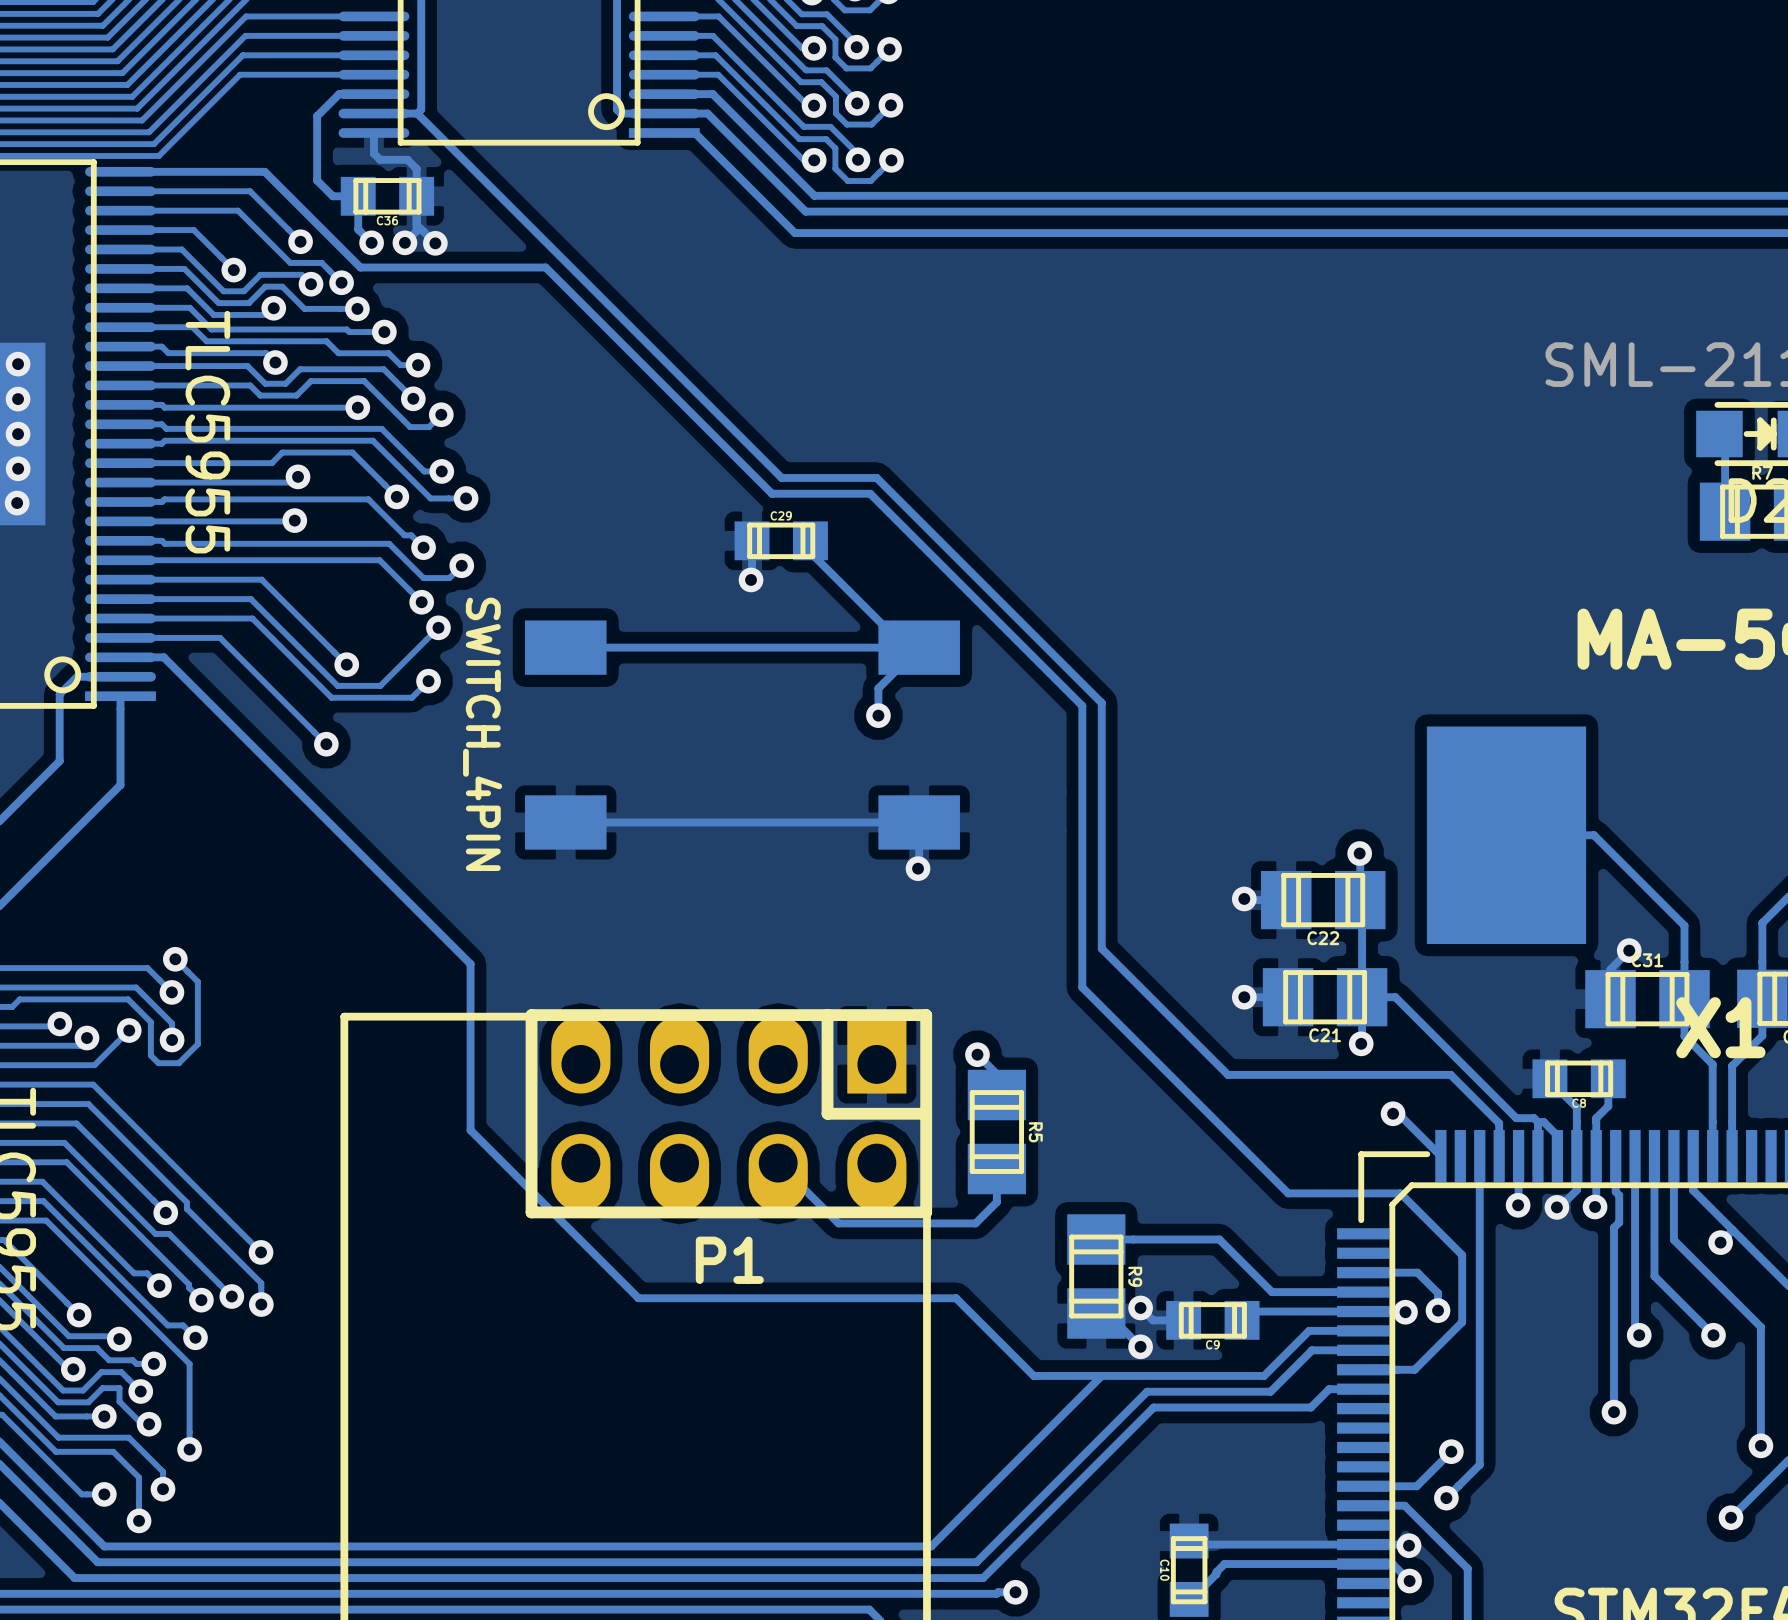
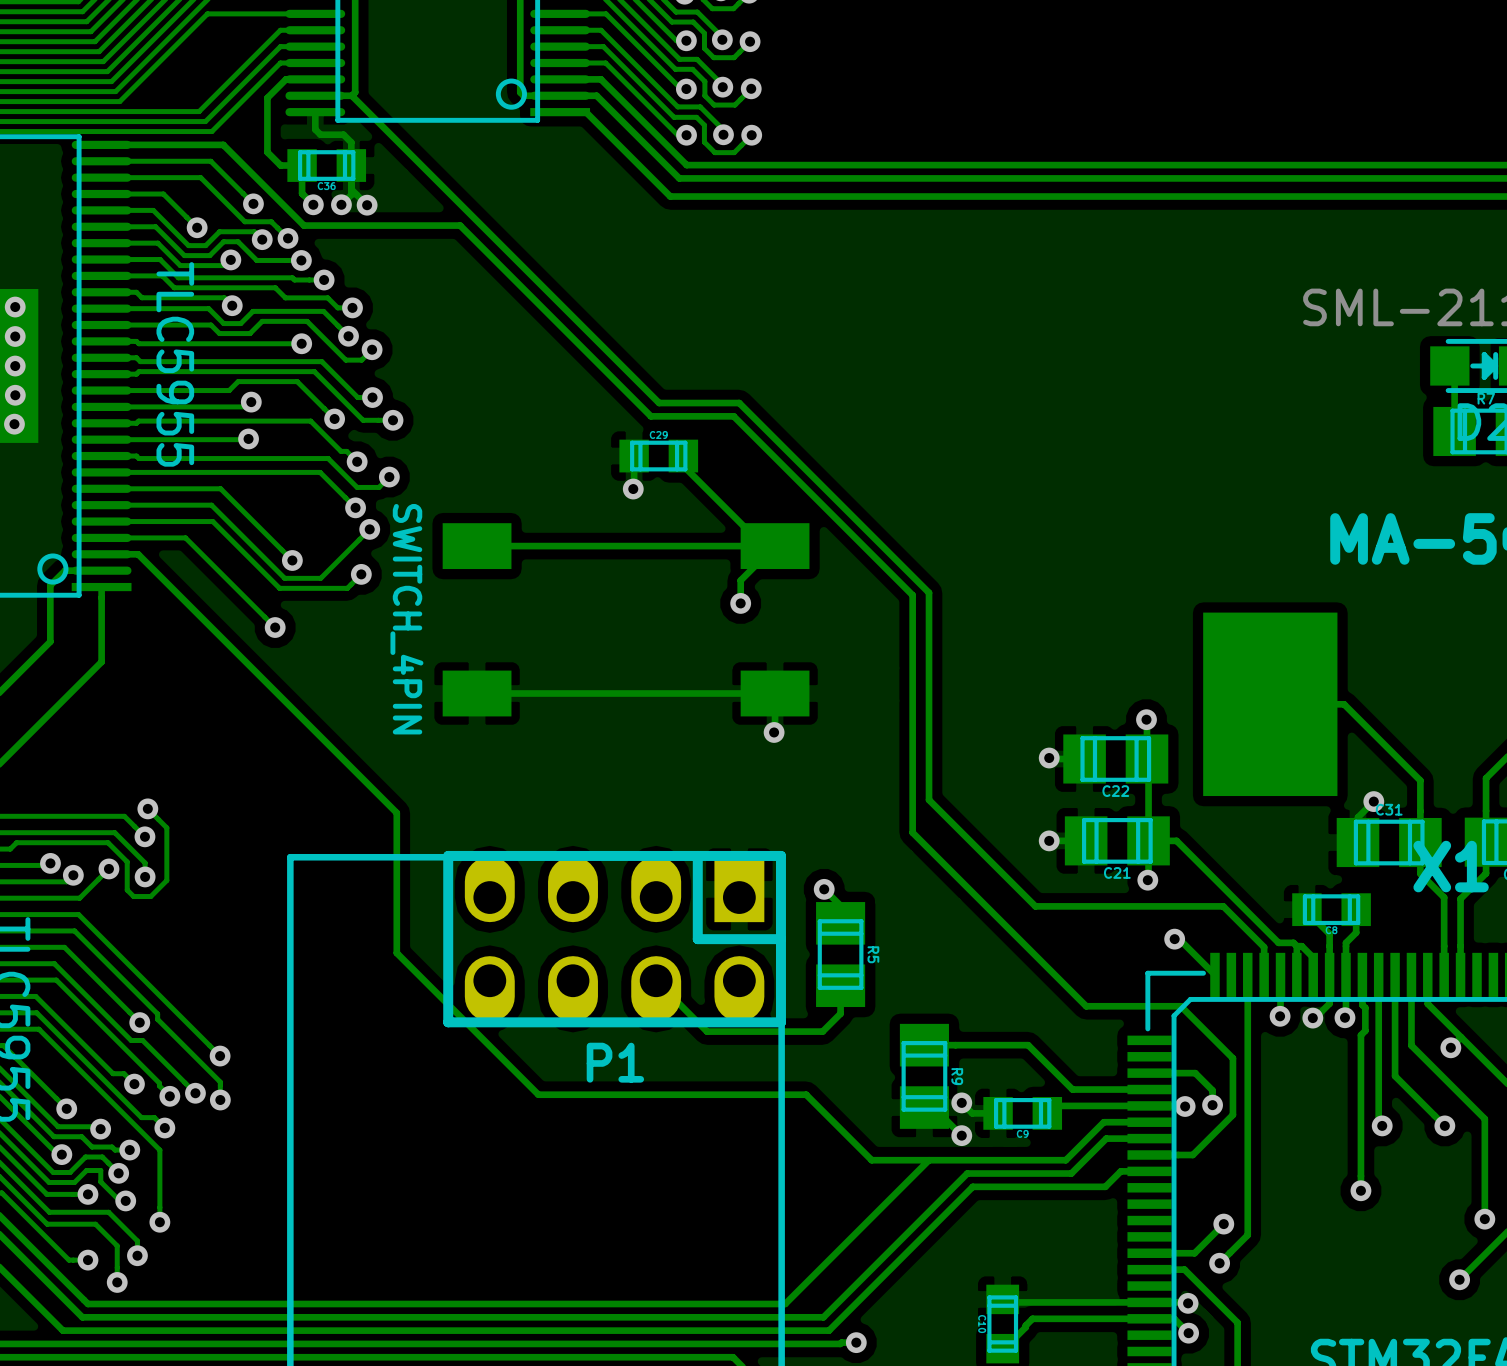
track: (332, 35) (245, 35) (149, 132) -> (280, 30) (199, 111) (125, 111)
track: (332, 55) (242, 55) (153, 144) -> (280, 46) (205, 121) (129, 121)
track: (332, 74) (240, 74) (158, 155) -> (280, 63) (211, 131) (133, 131)

